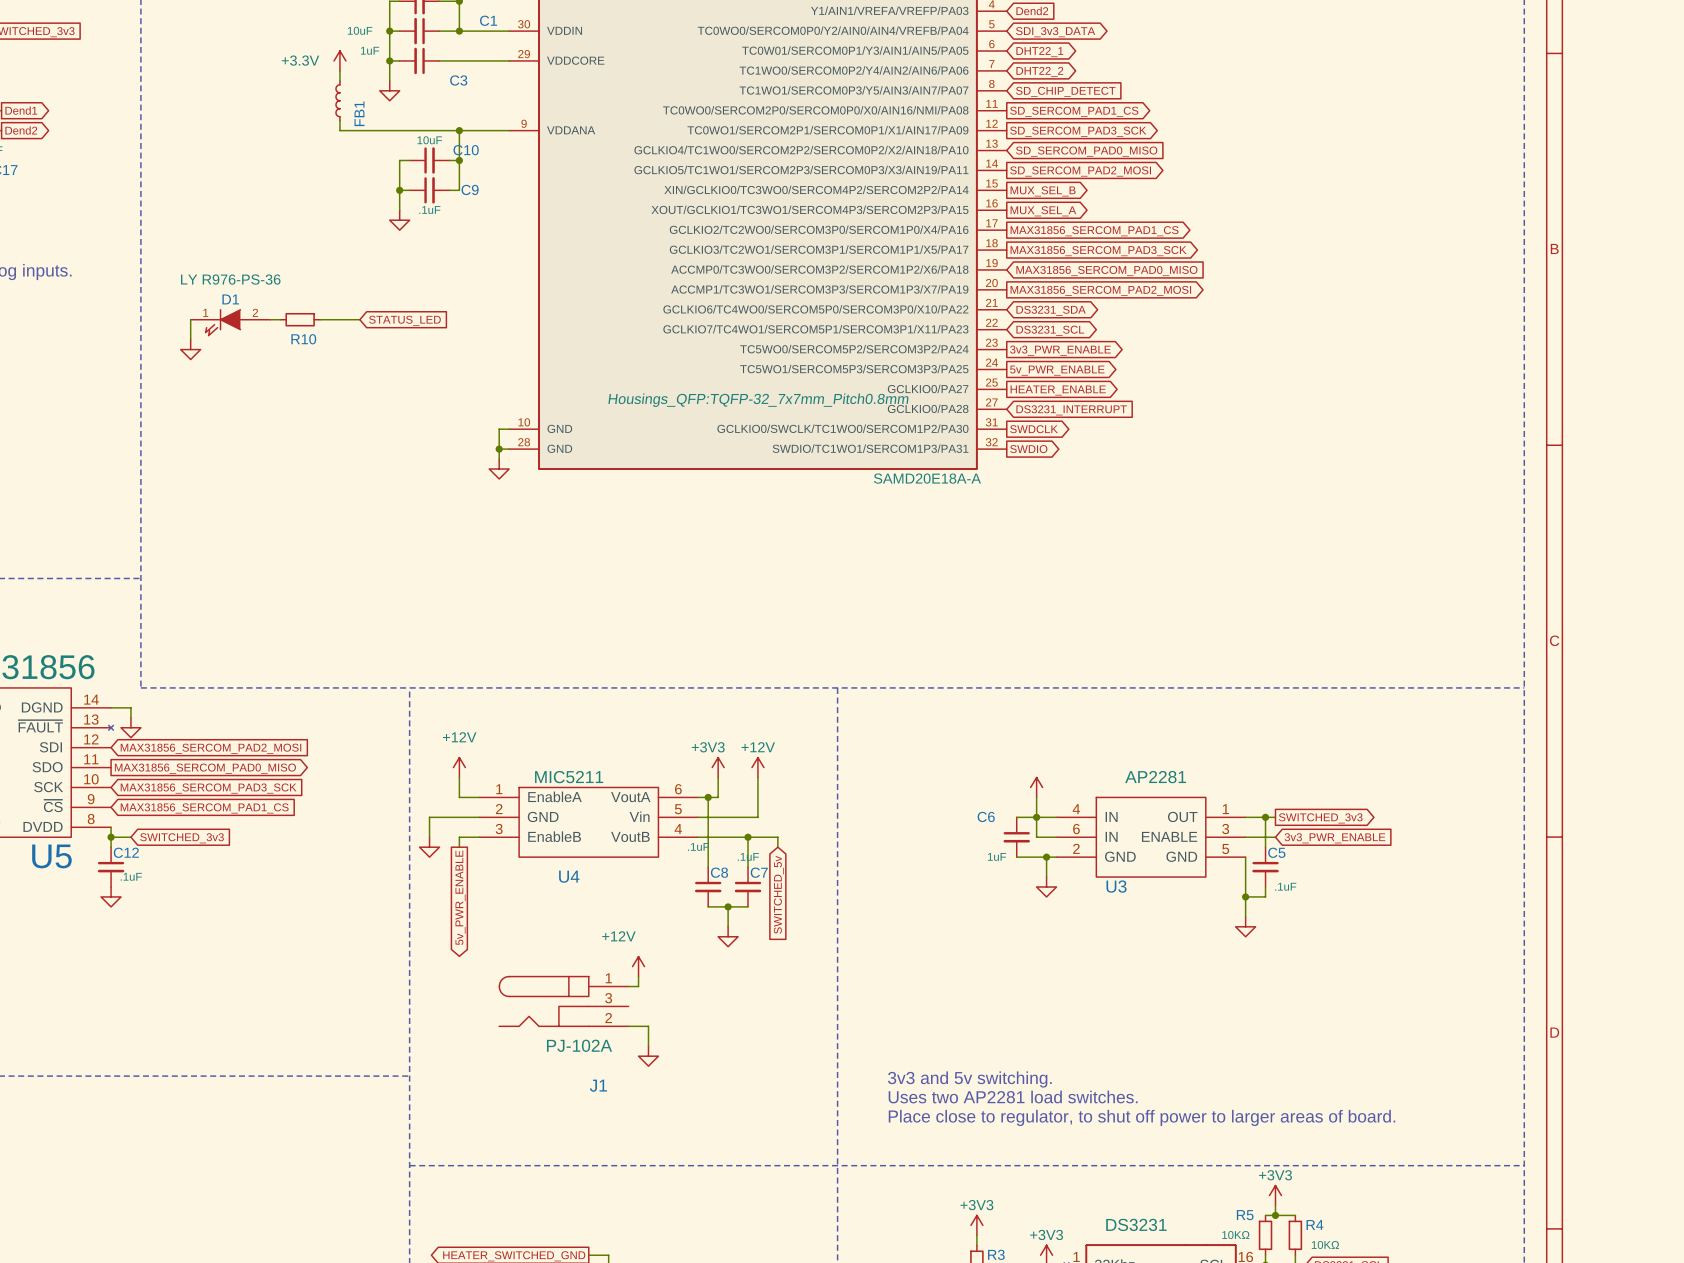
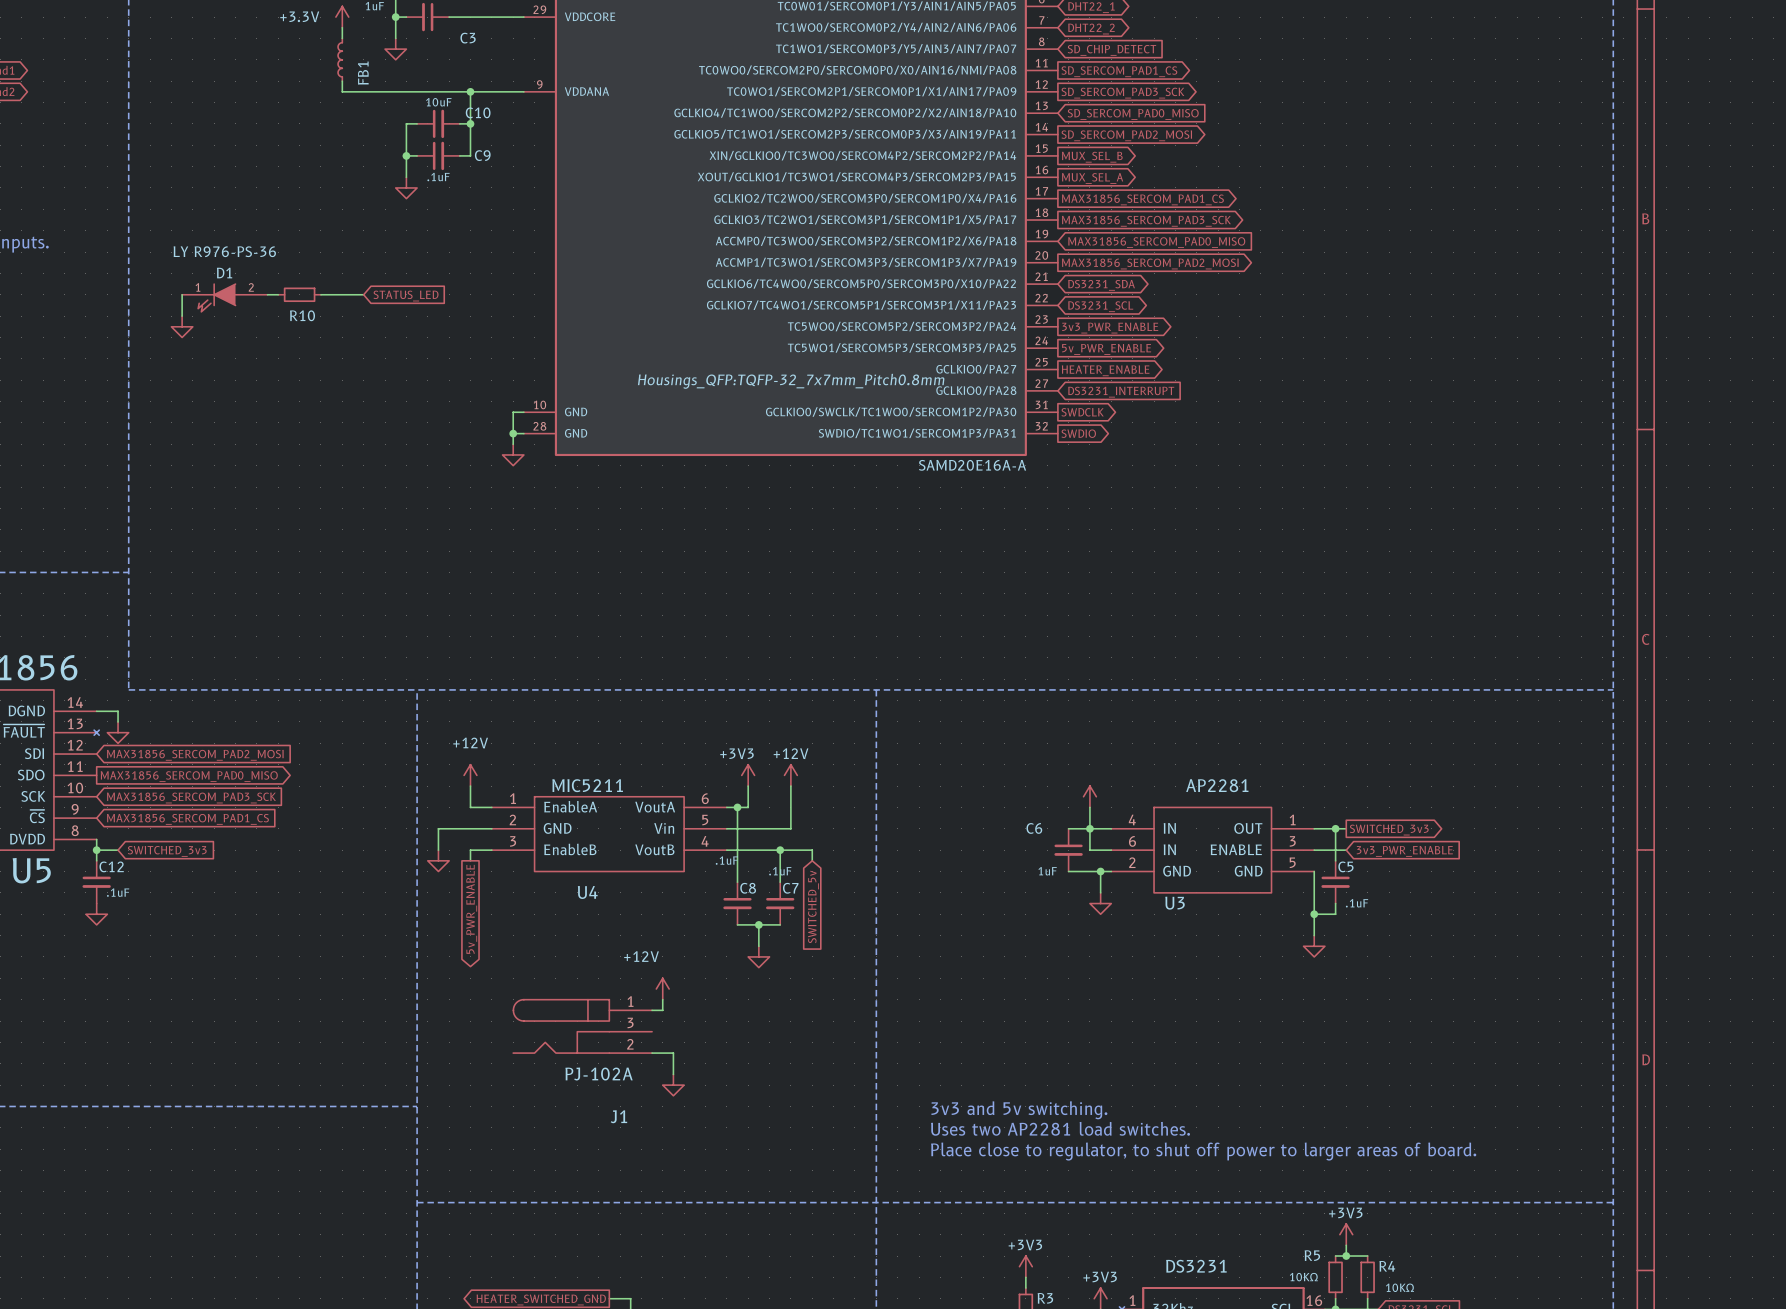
part value: SAMD20E18A-A (927, 478) -> SAMD20E16A-A (972, 465)

